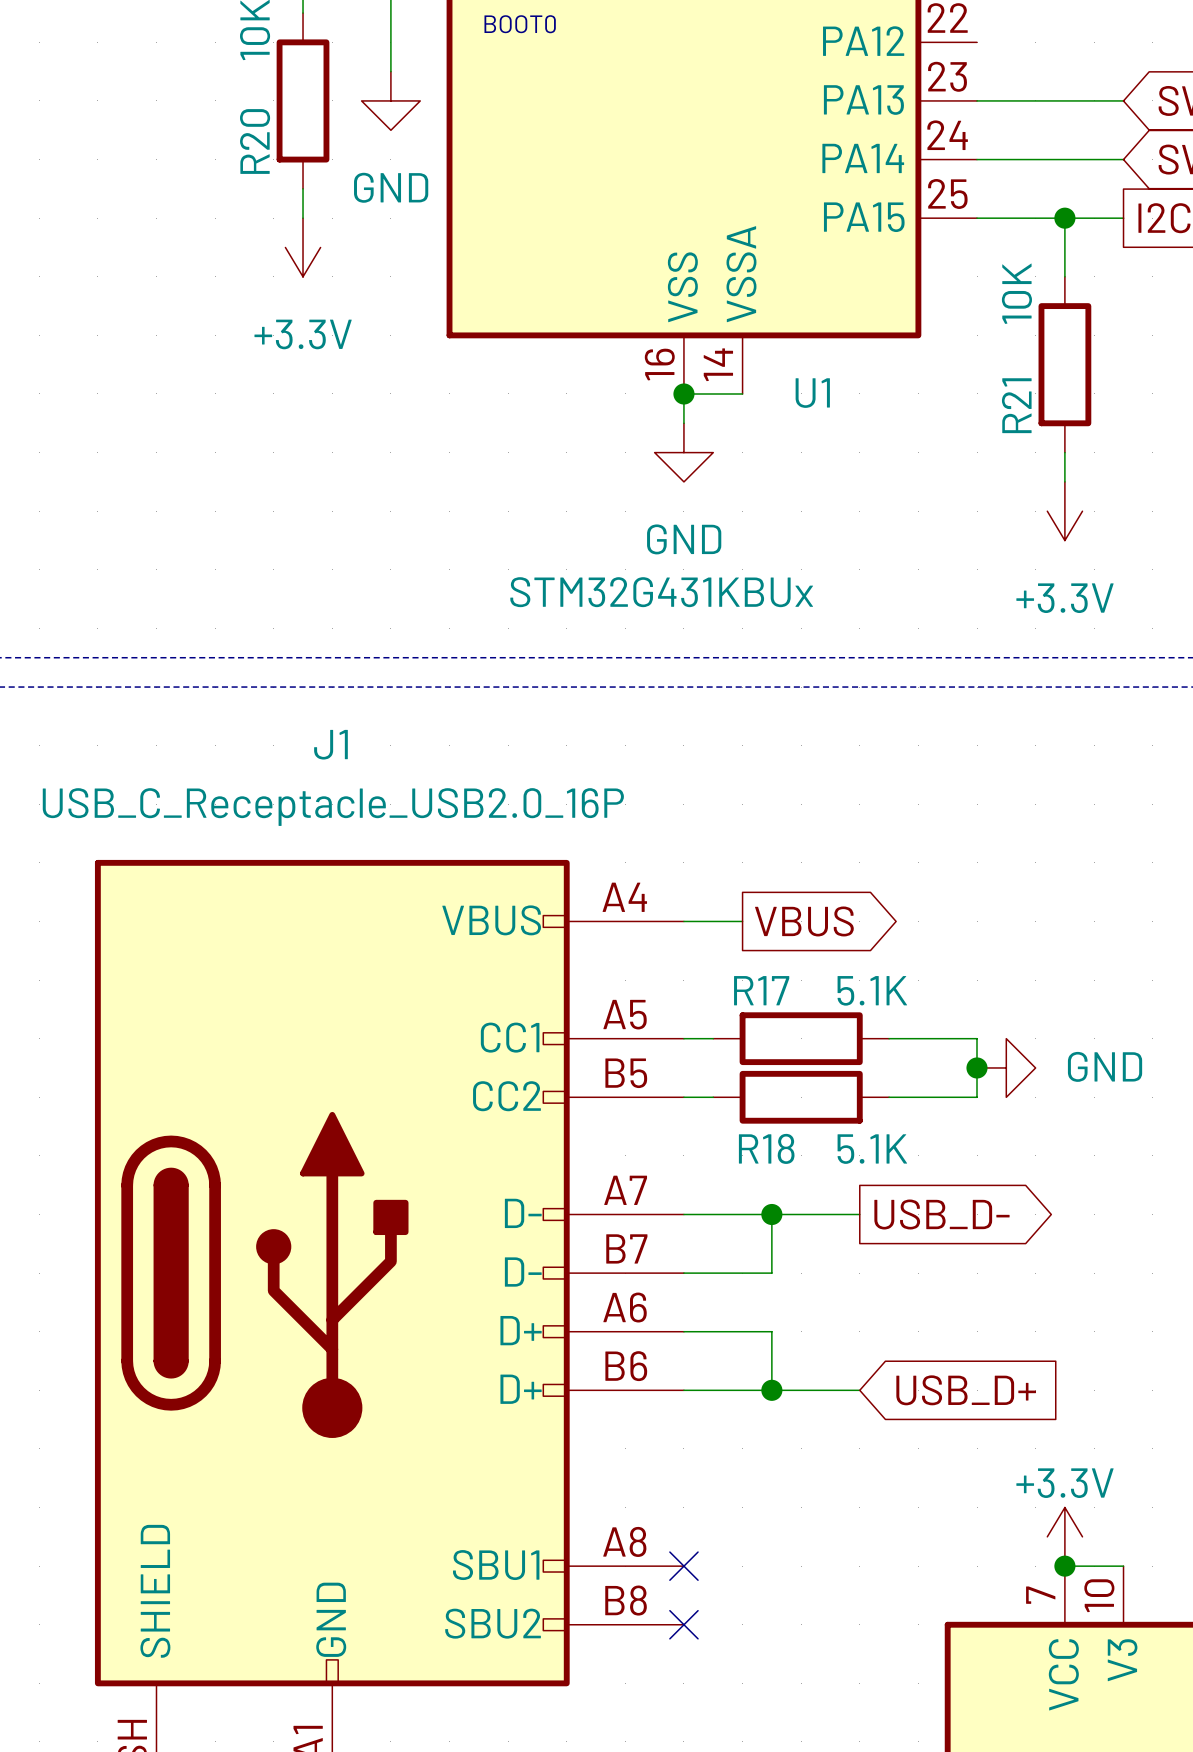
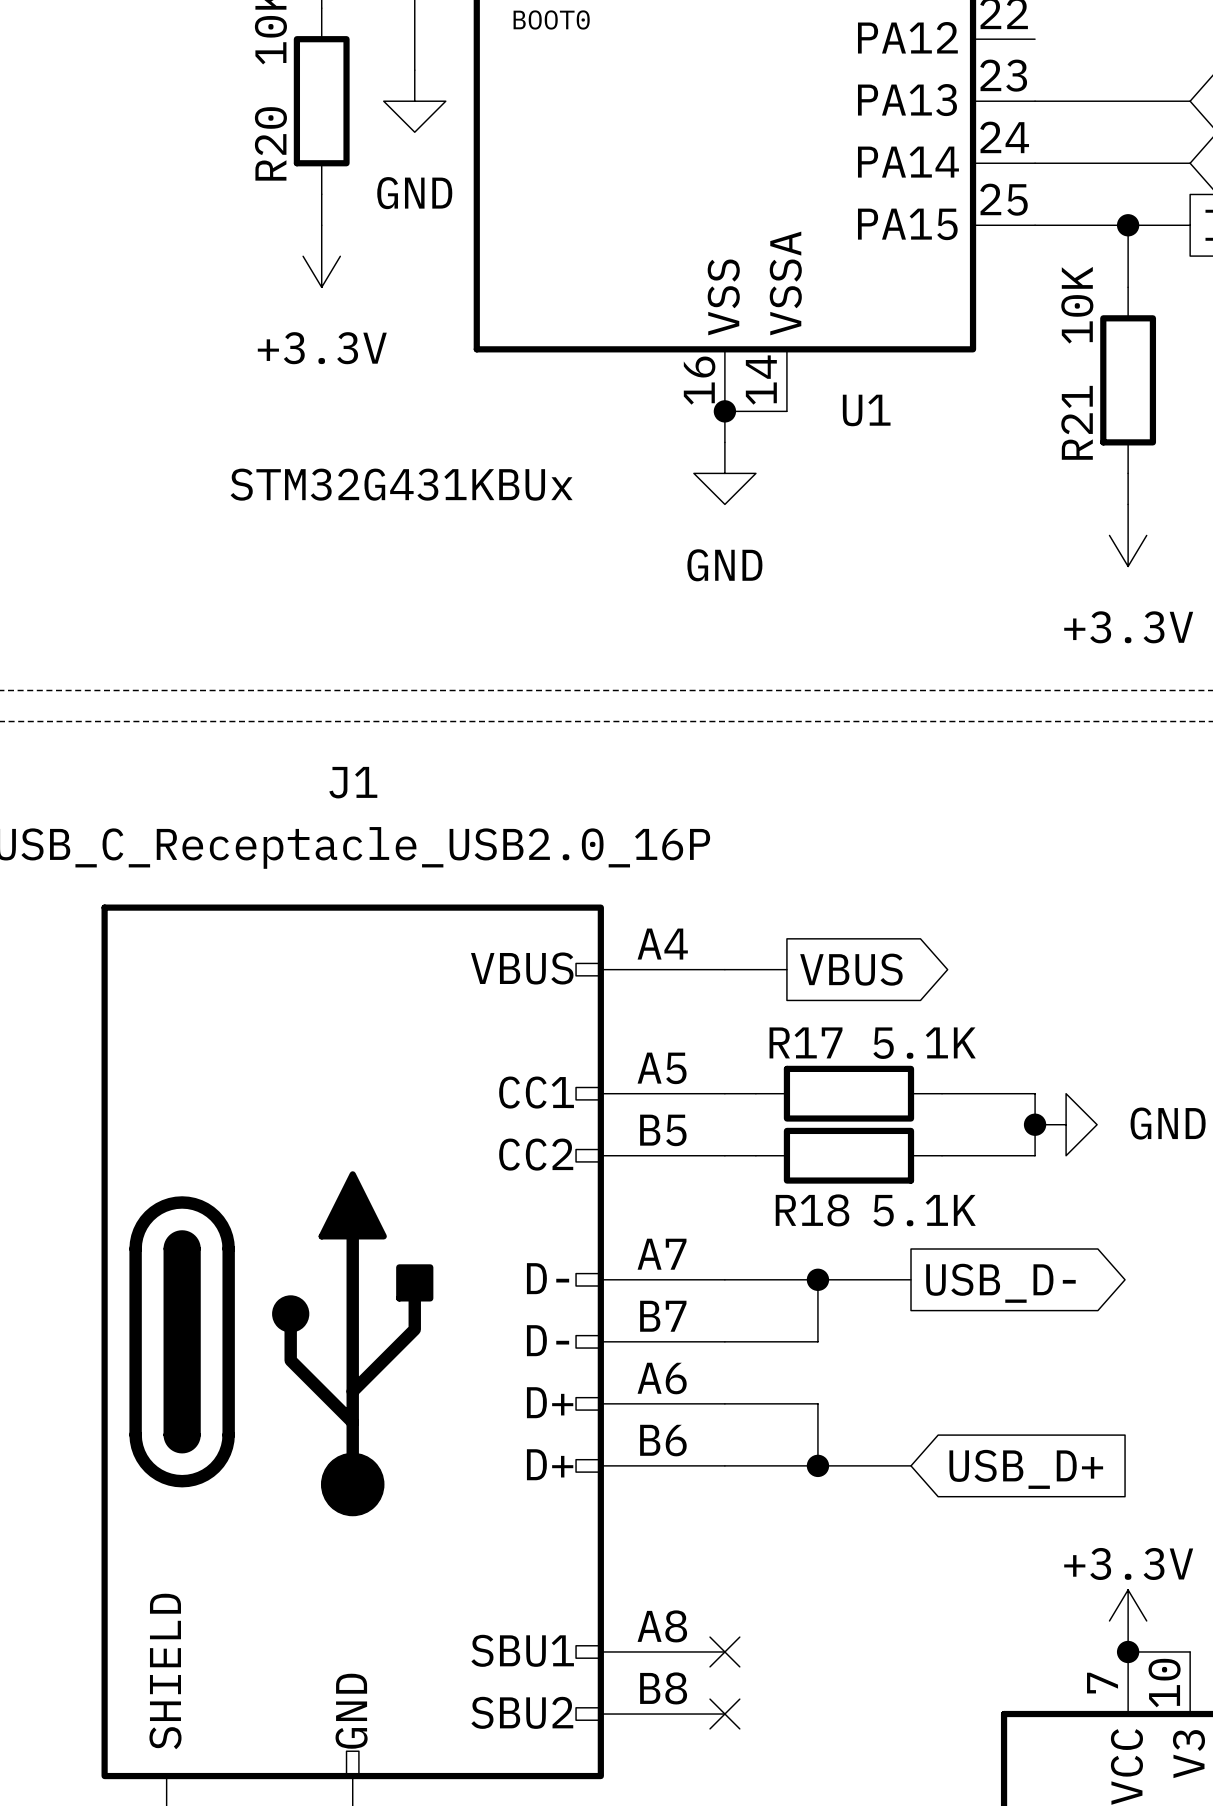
U1 value position: STM32G431KBUx (661, 592) -> STM32G431KBUx (401, 484)

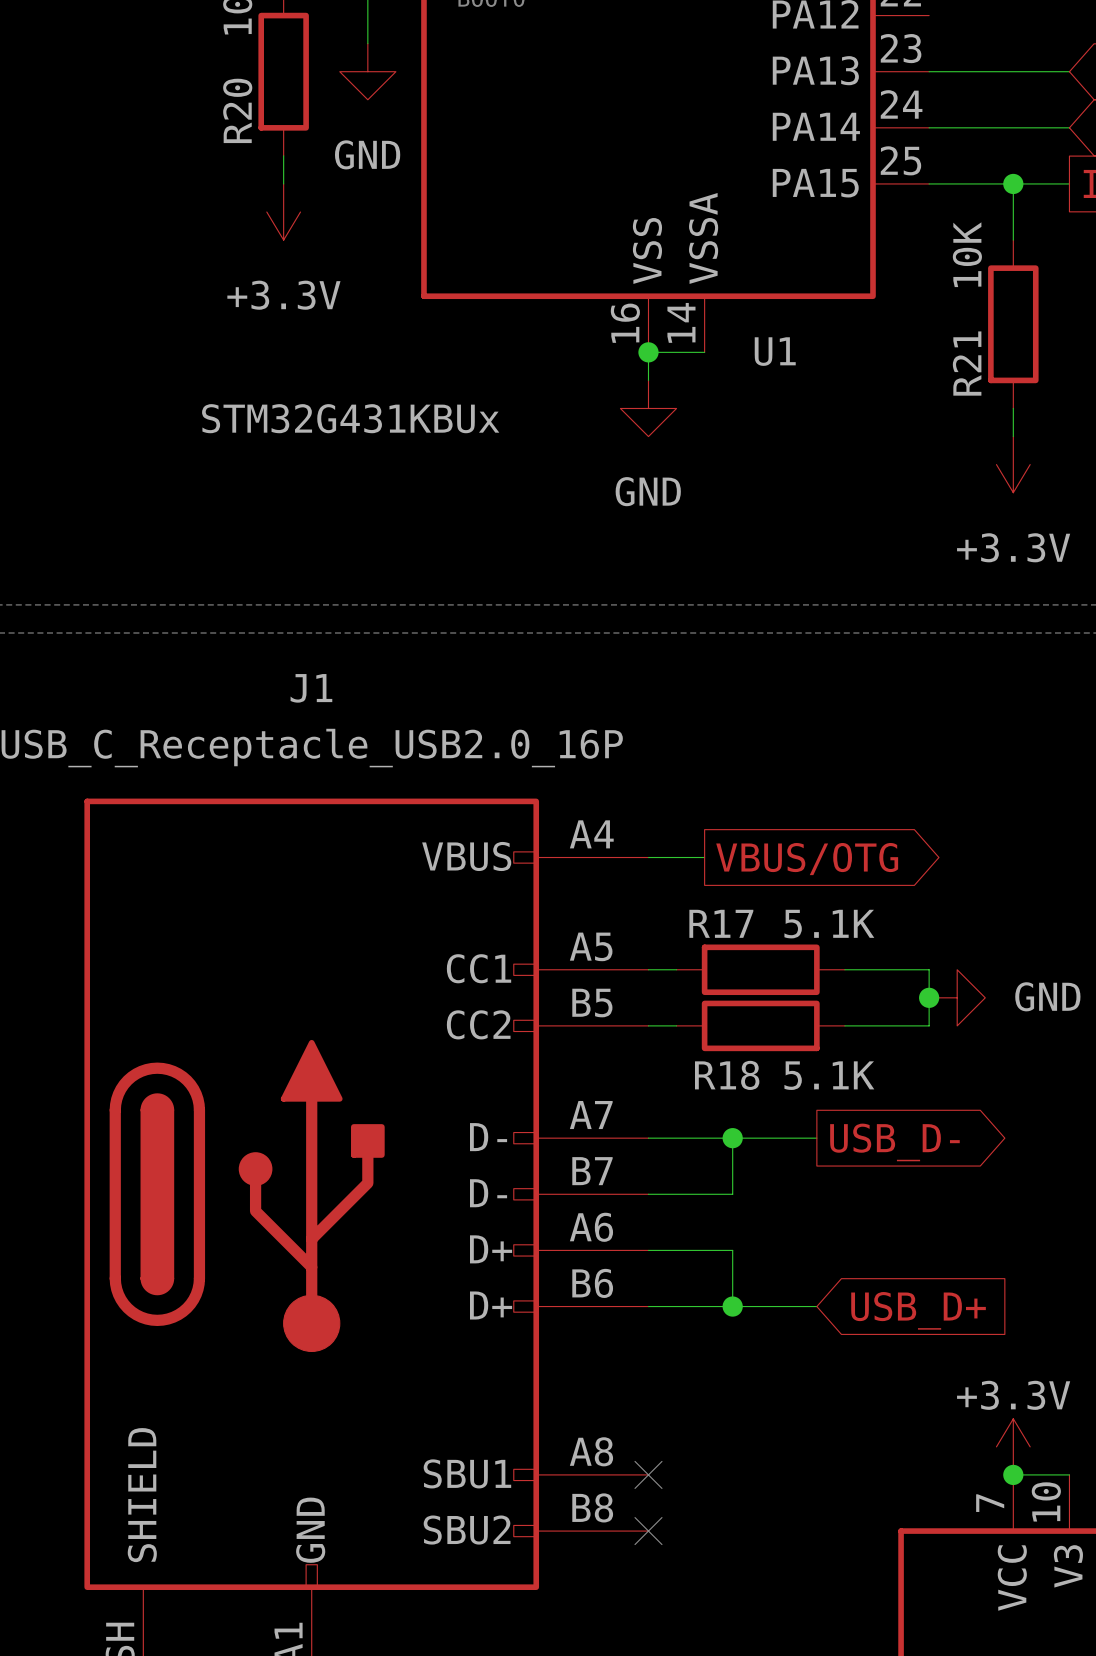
global label: VBUS (851, 969) -> VBUS/OTG (807, 859)

